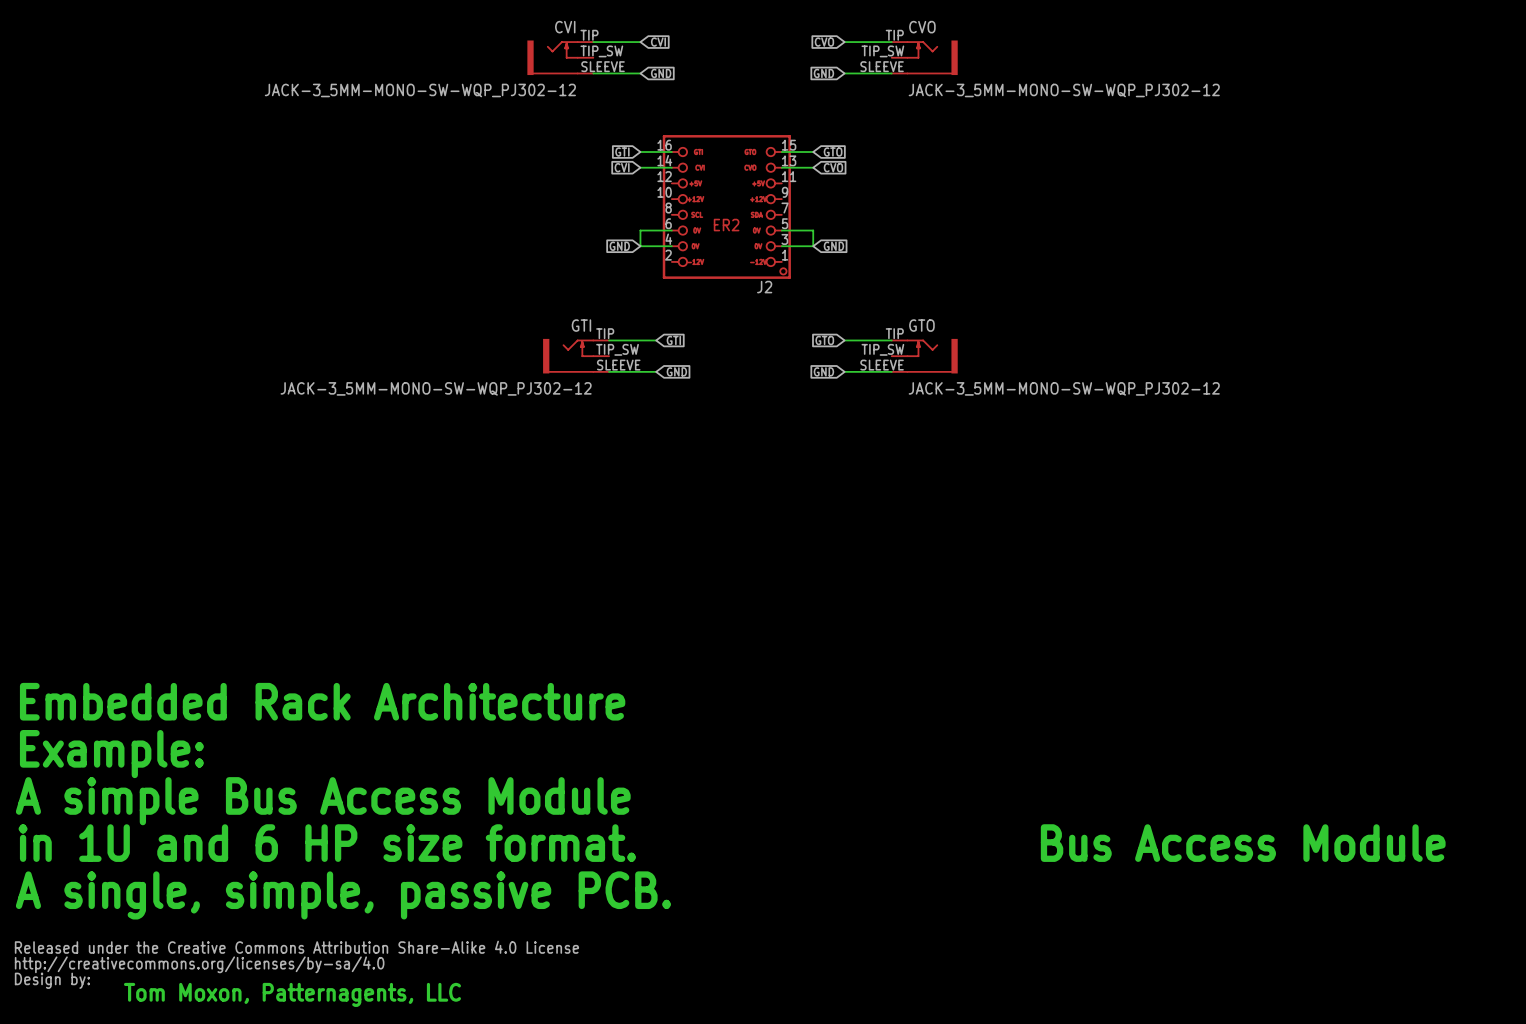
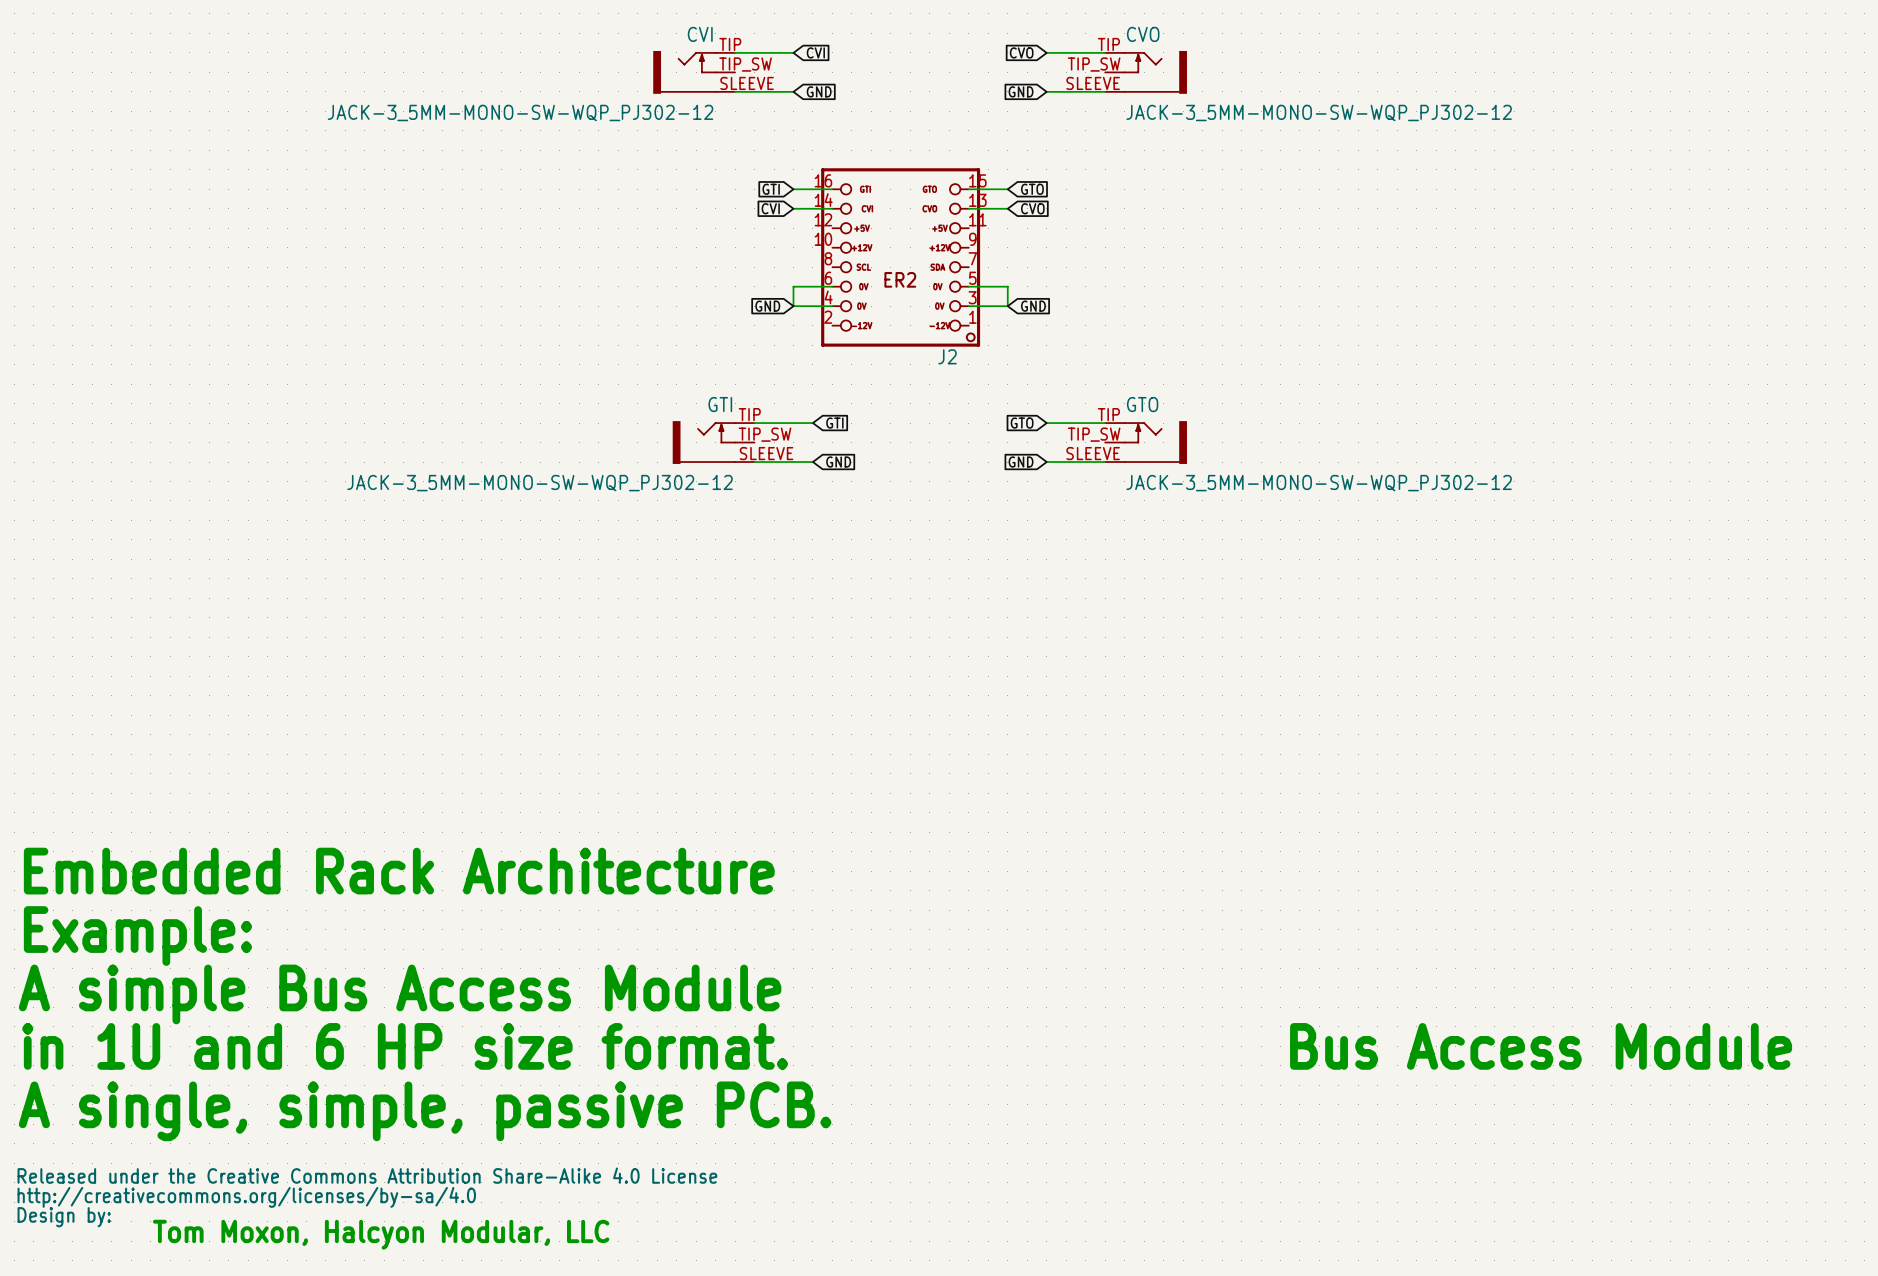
text: Tom Moxon, Patternagents, LLC (292, 994) -> Tom Moxon, Halcyon Modular, LLC (381, 1234)

